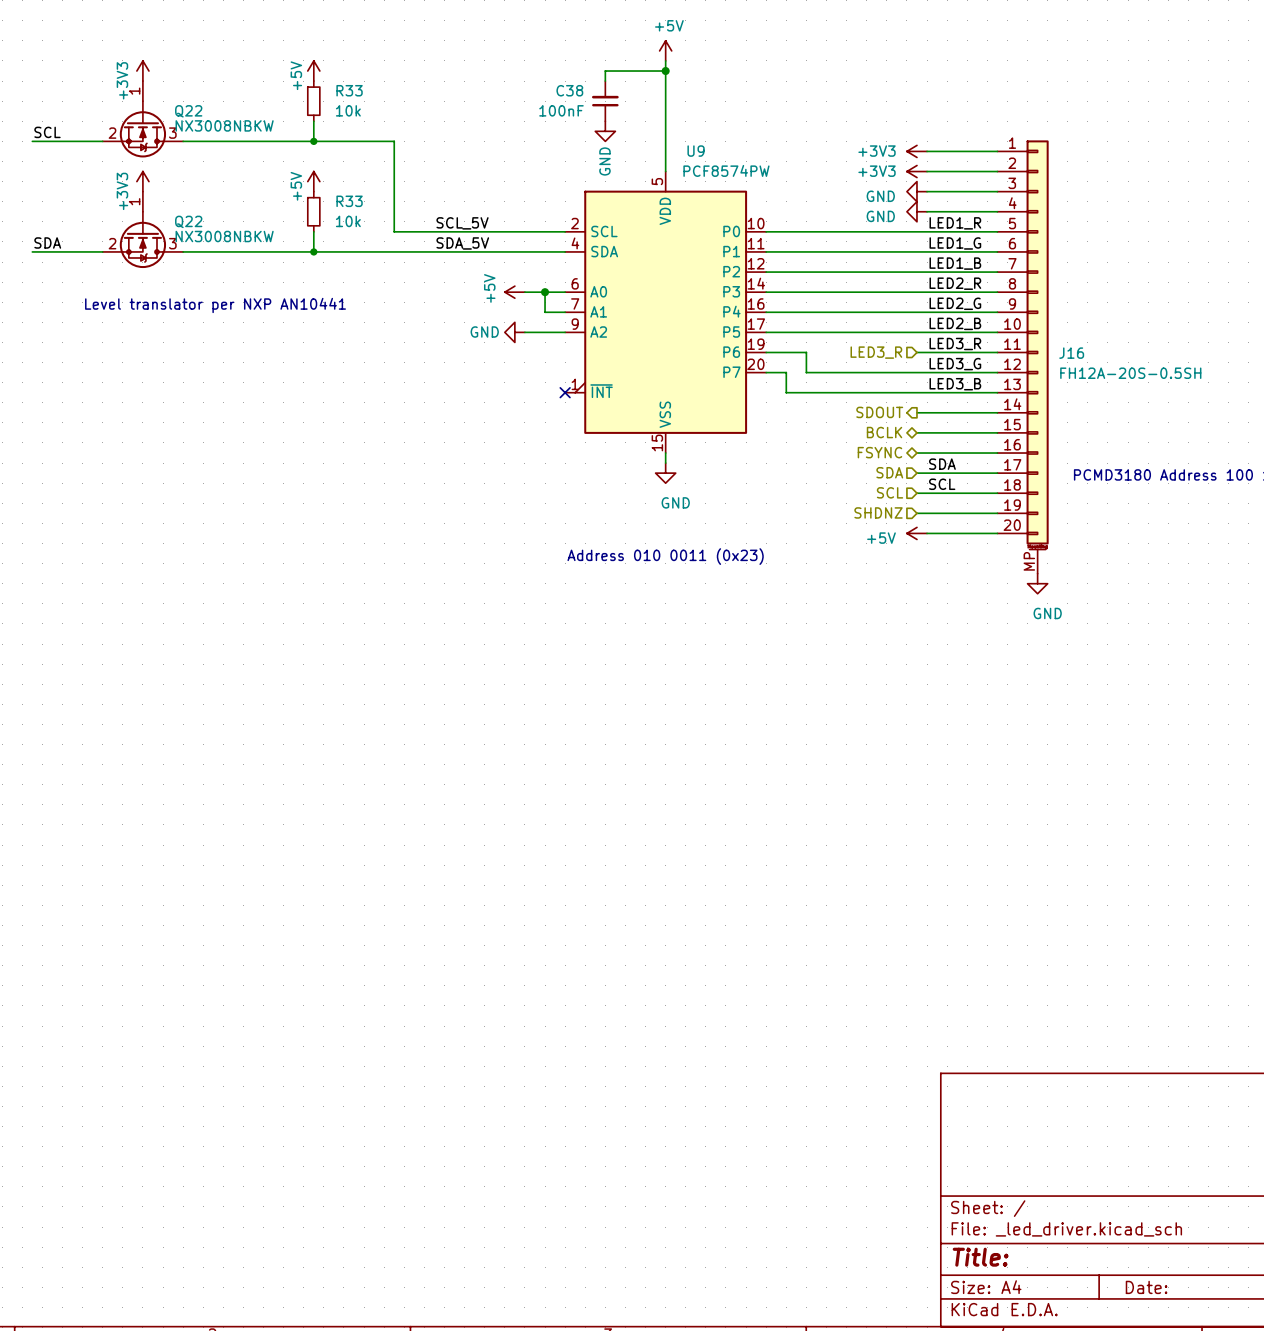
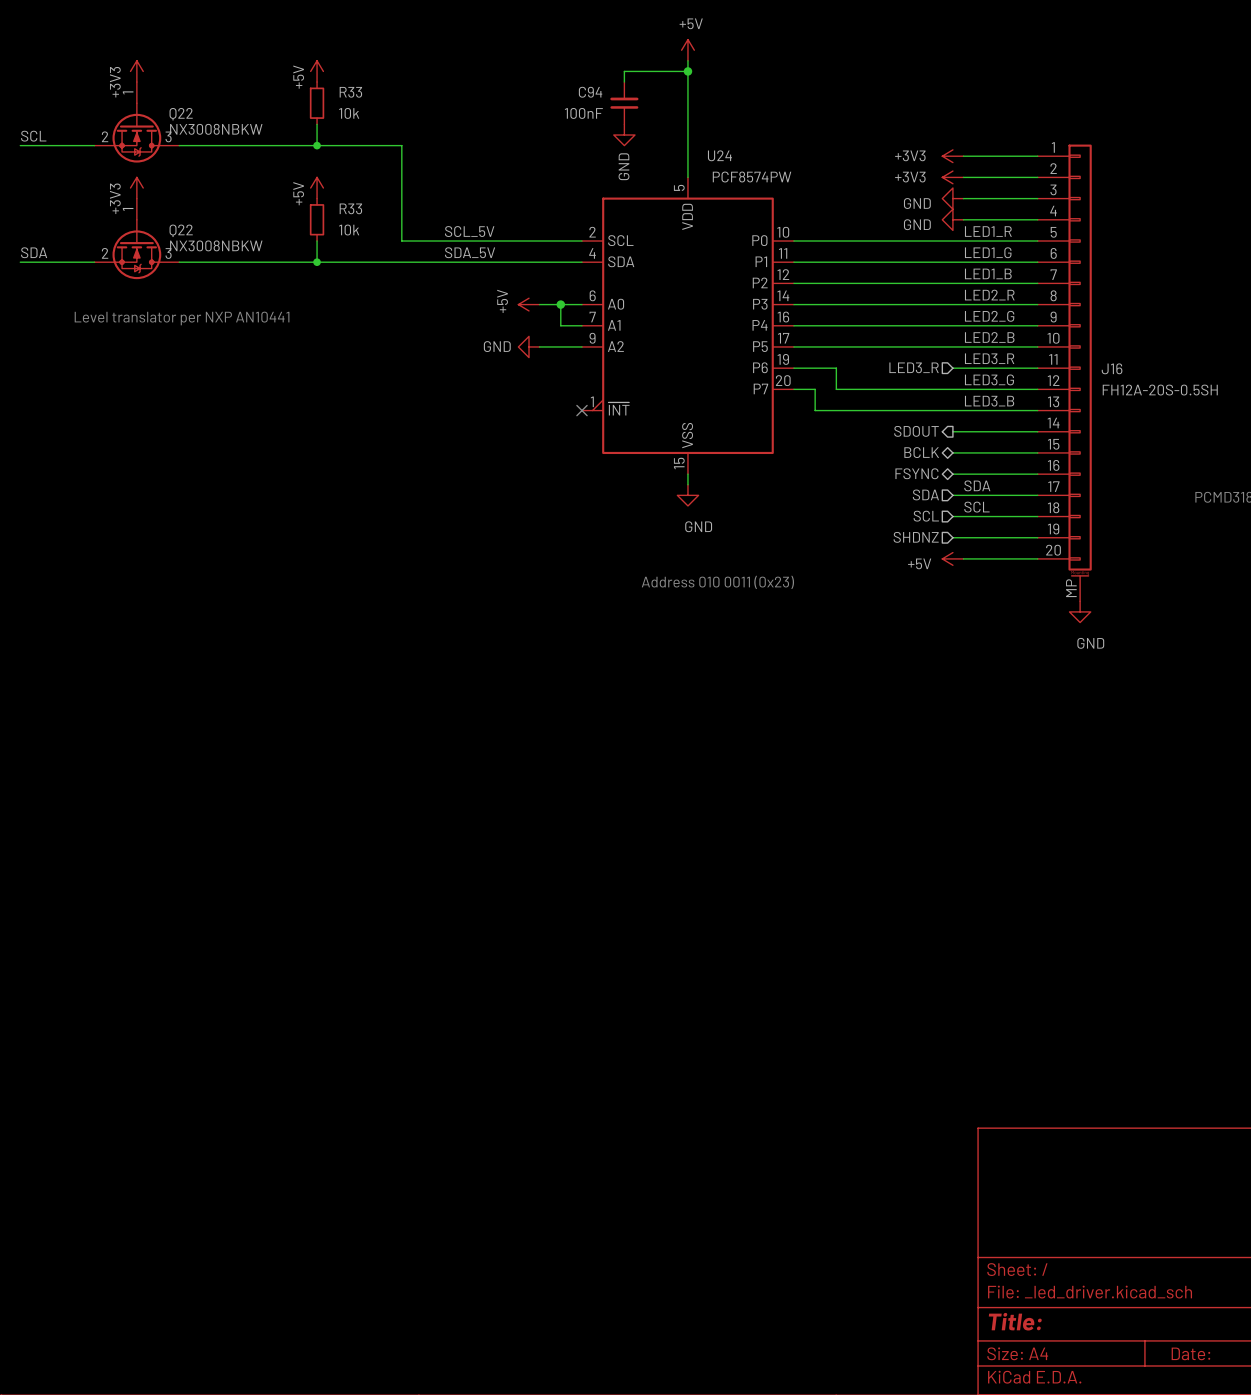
C38 name: C38 (569, 90) -> C94 (590, 92)
U9 name: U9 (696, 151) -> U24 (719, 155)

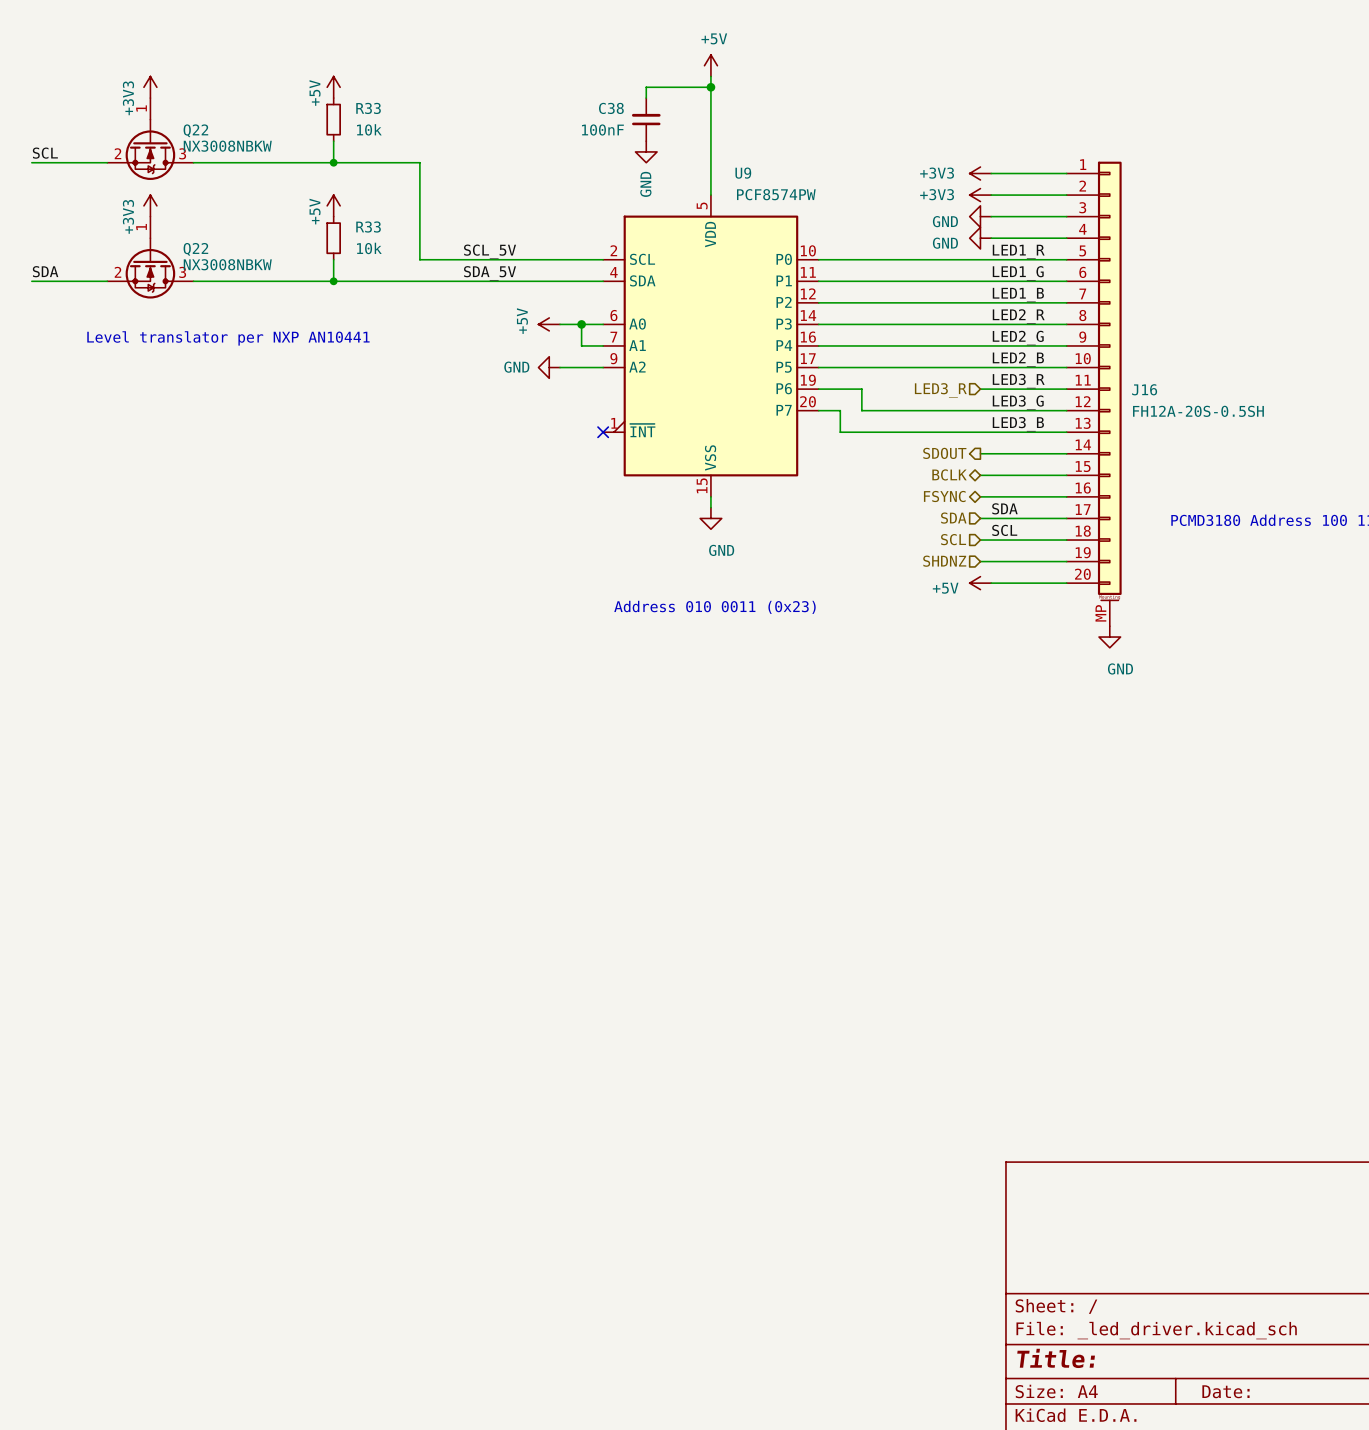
C94 name: C94 (590, 92) -> C38 (611, 108)
U24 name: U24 (719, 155) -> U9 (743, 173)

